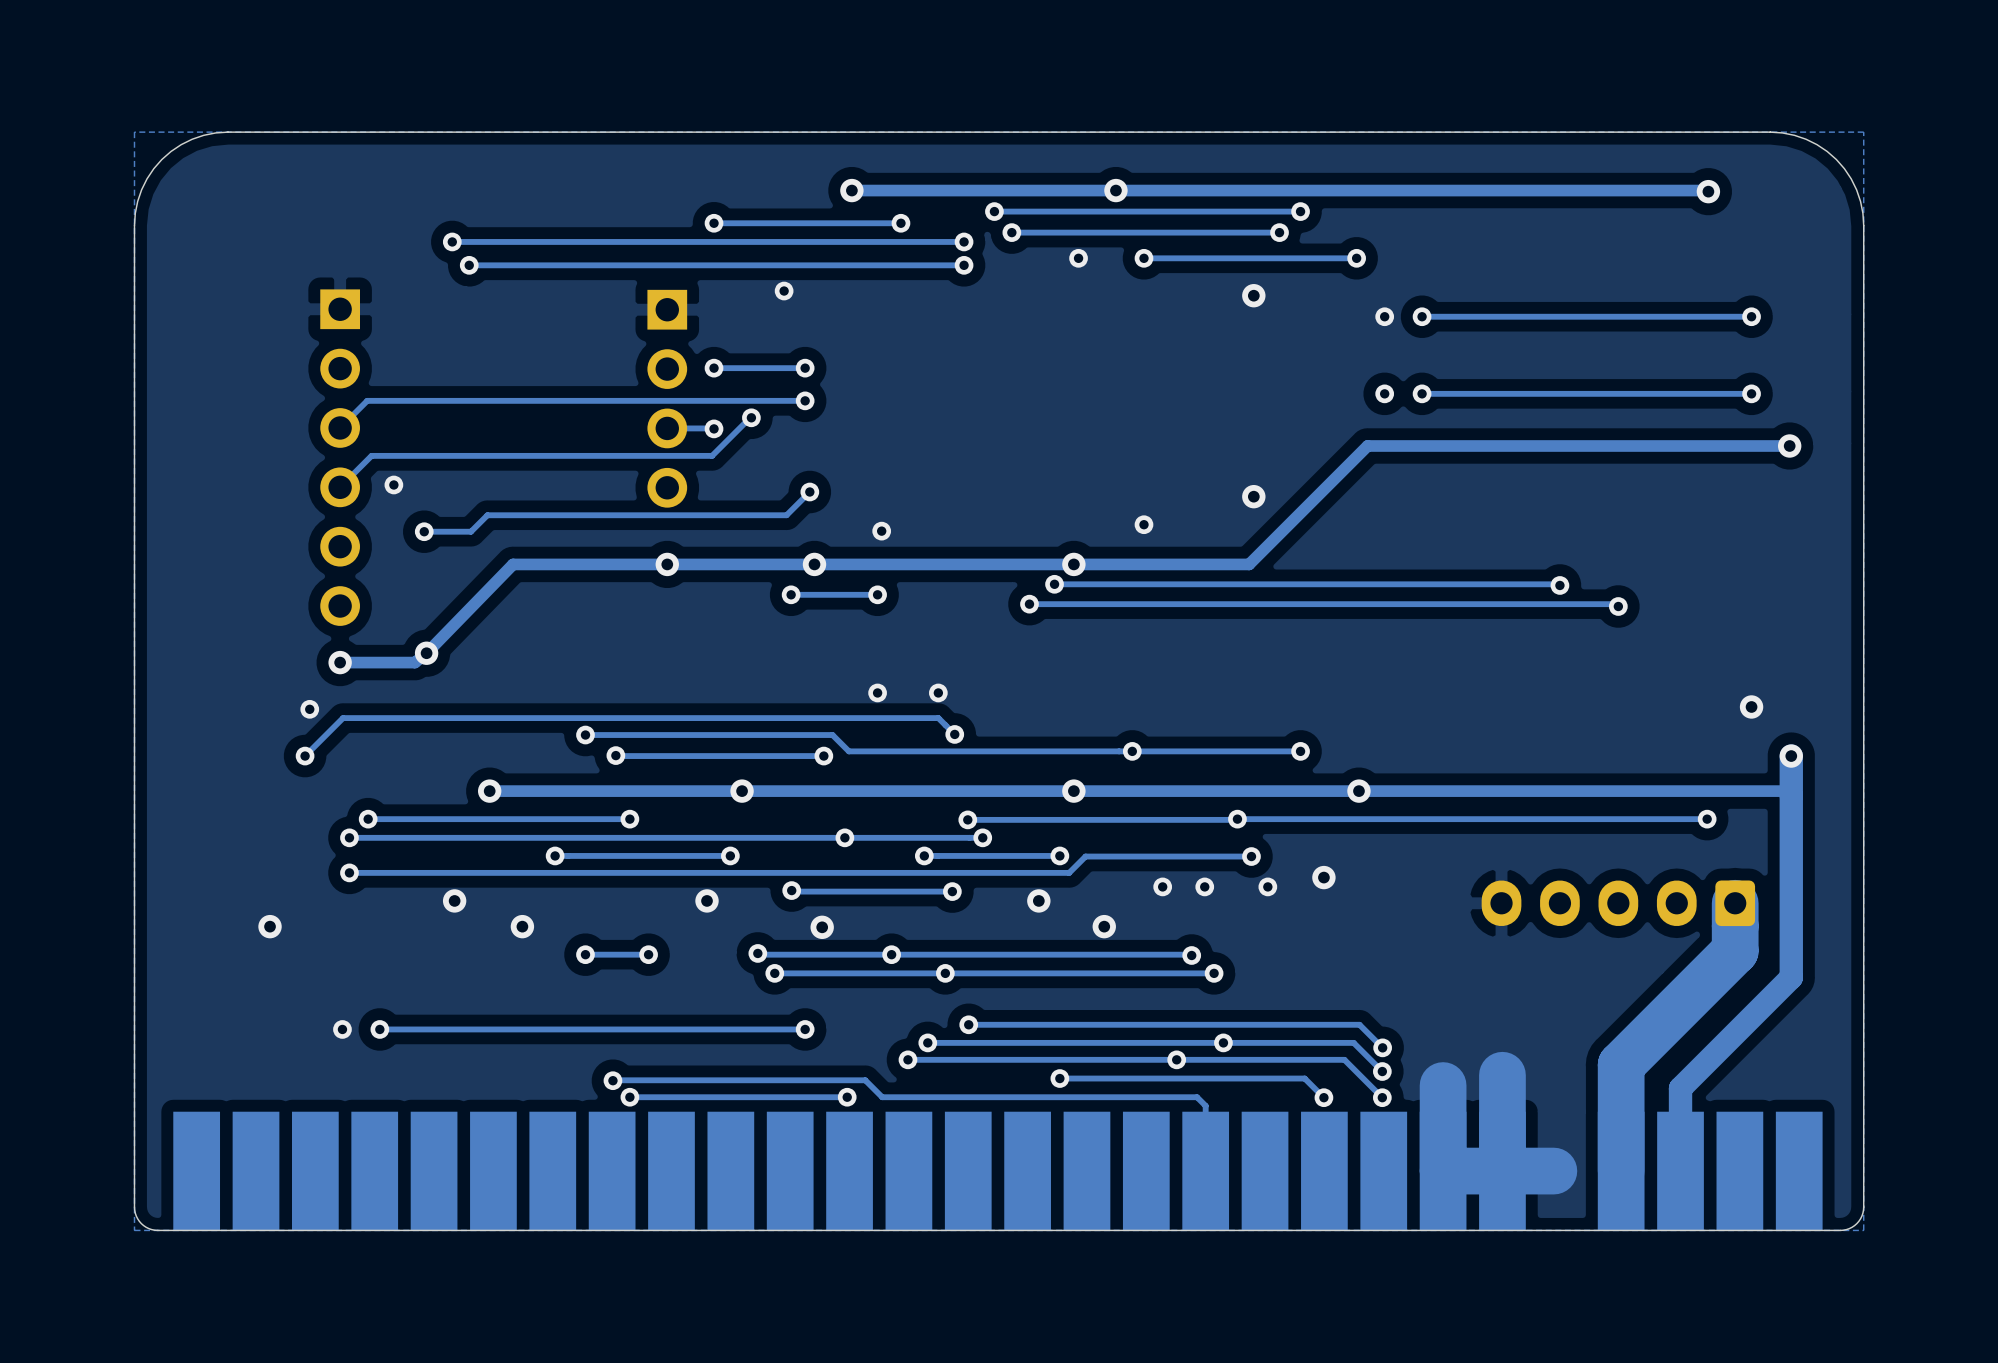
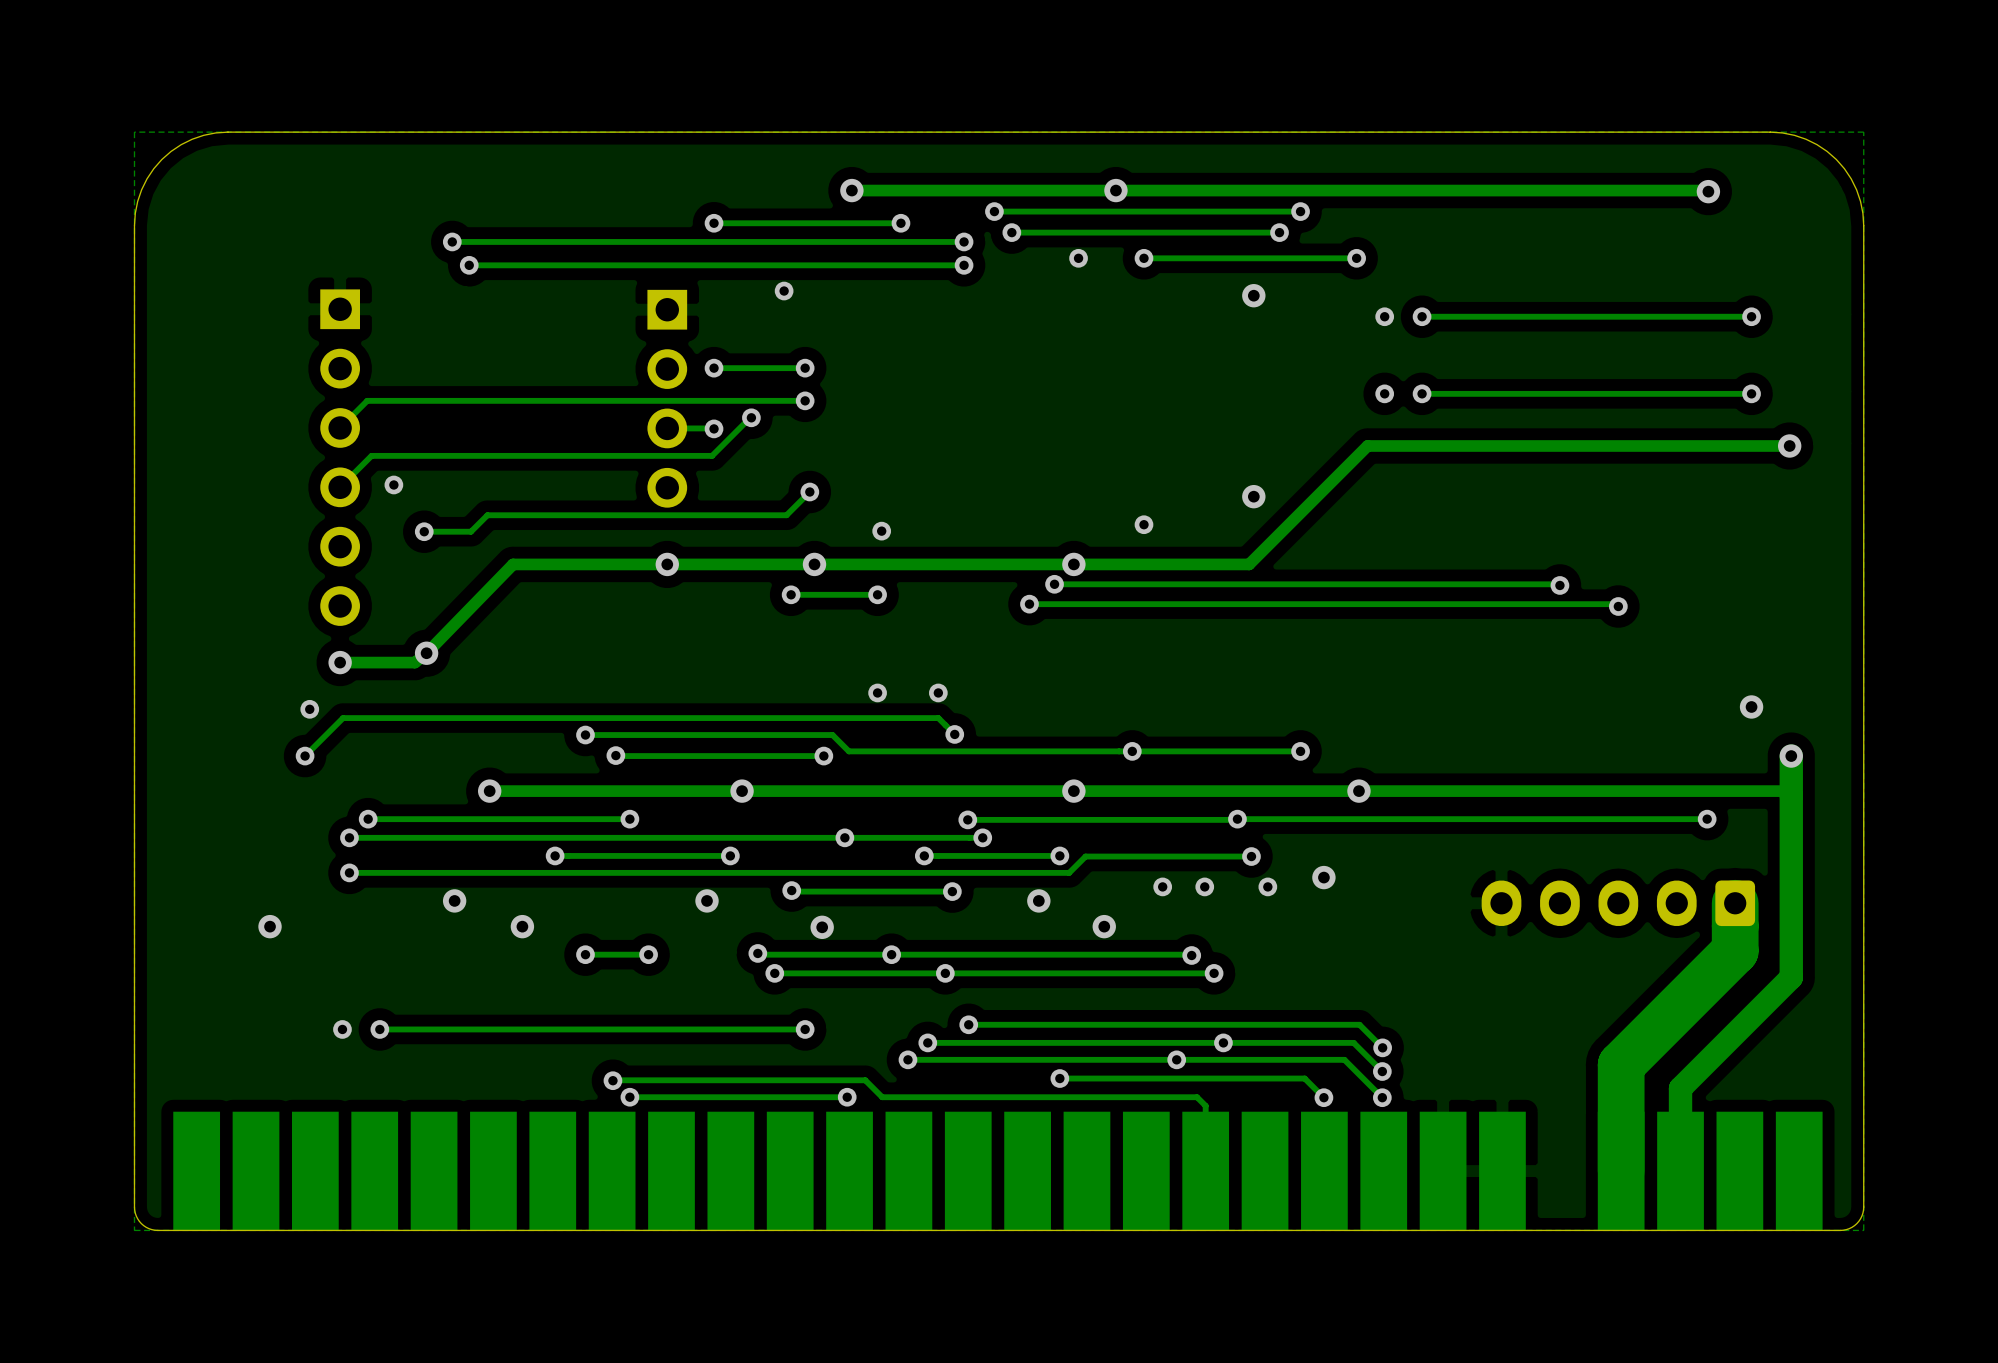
track: (1502, 1075) (1502, 1171) -> none
track: (1443, 1085) (1443, 1171) (1553, 1171) -> none

